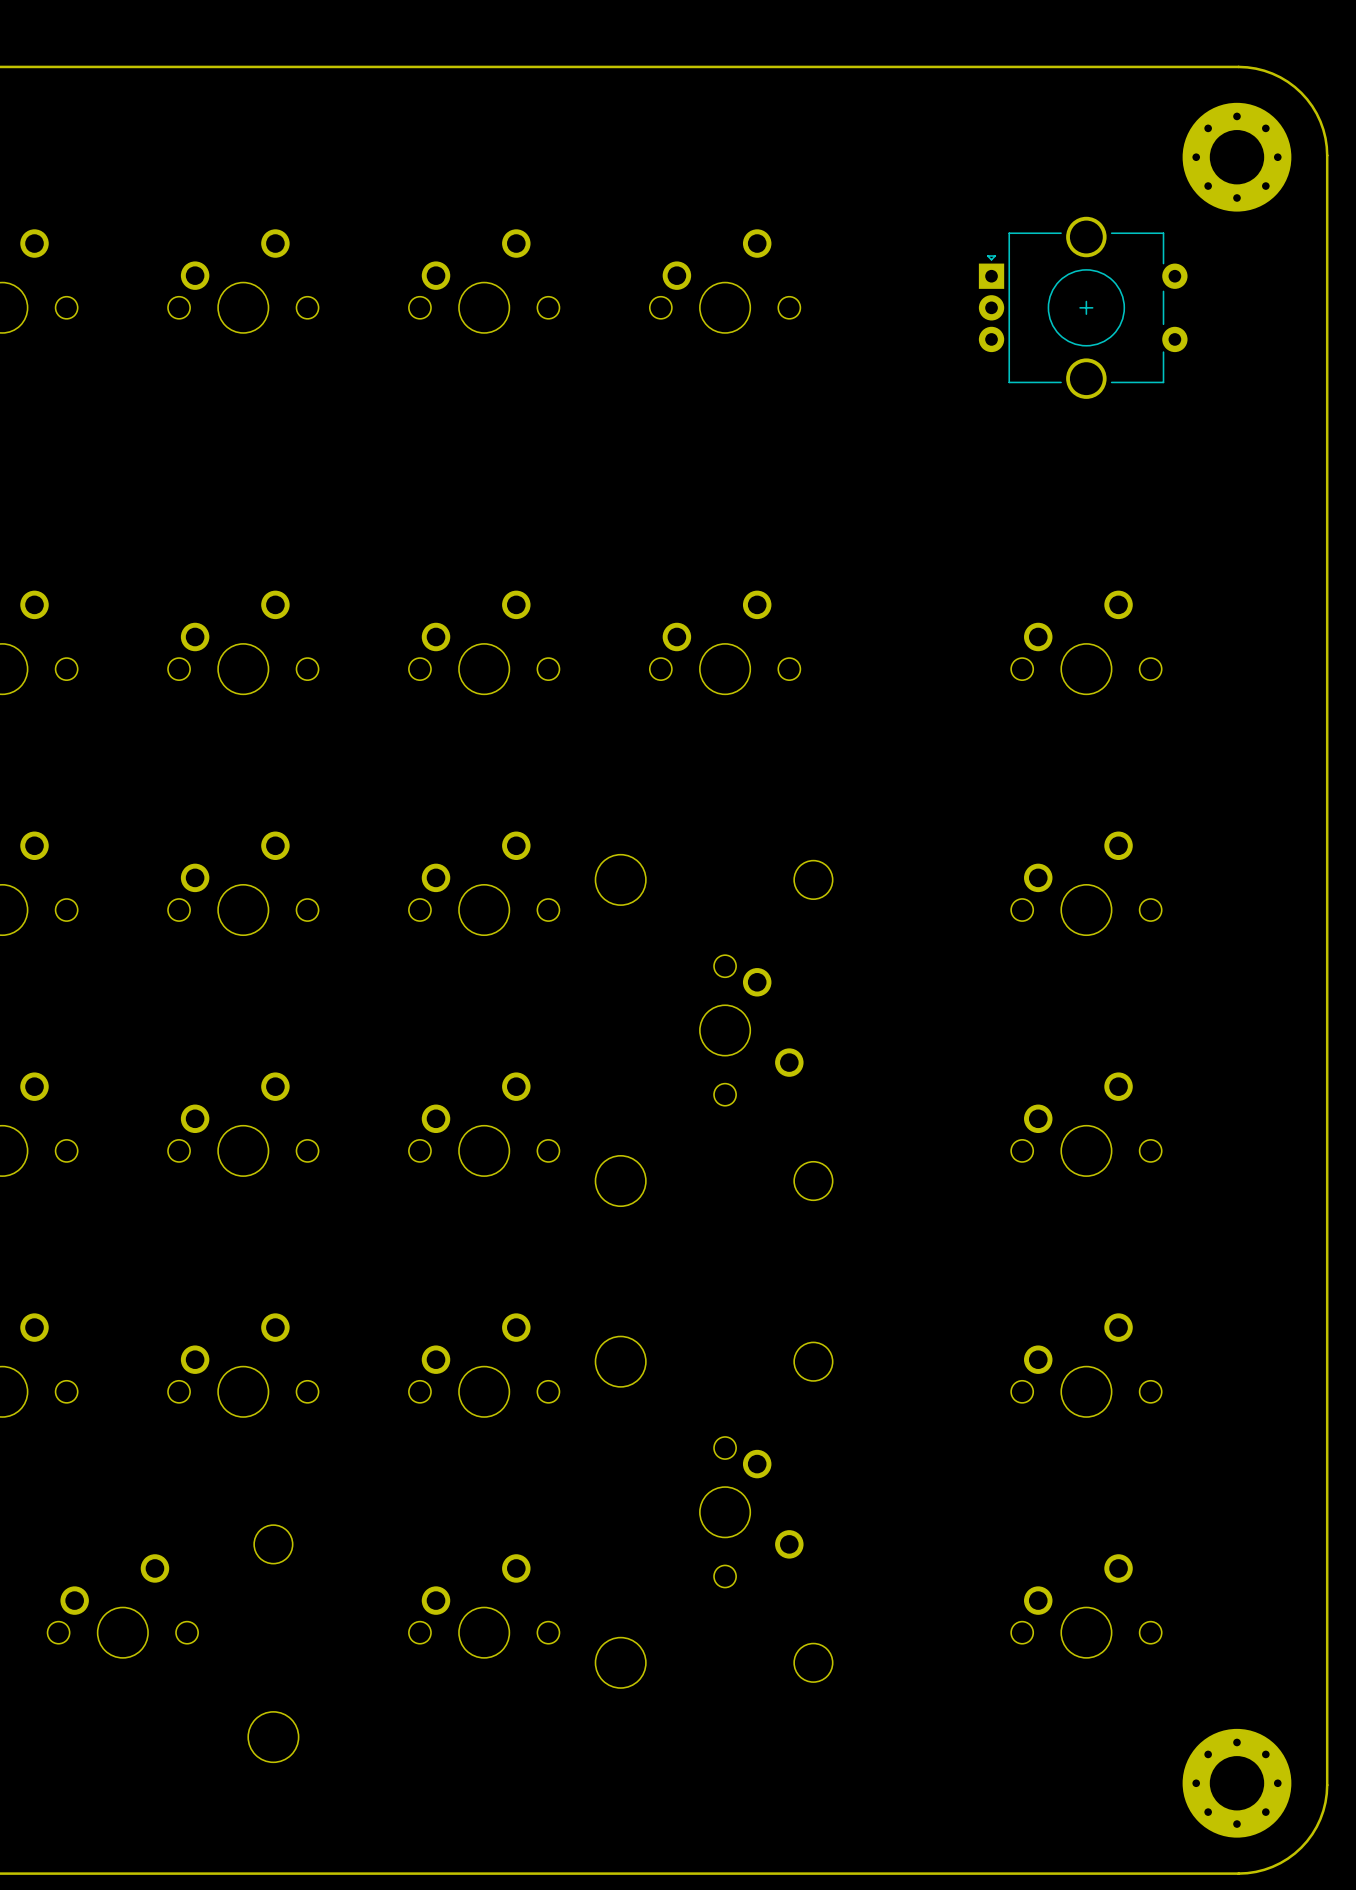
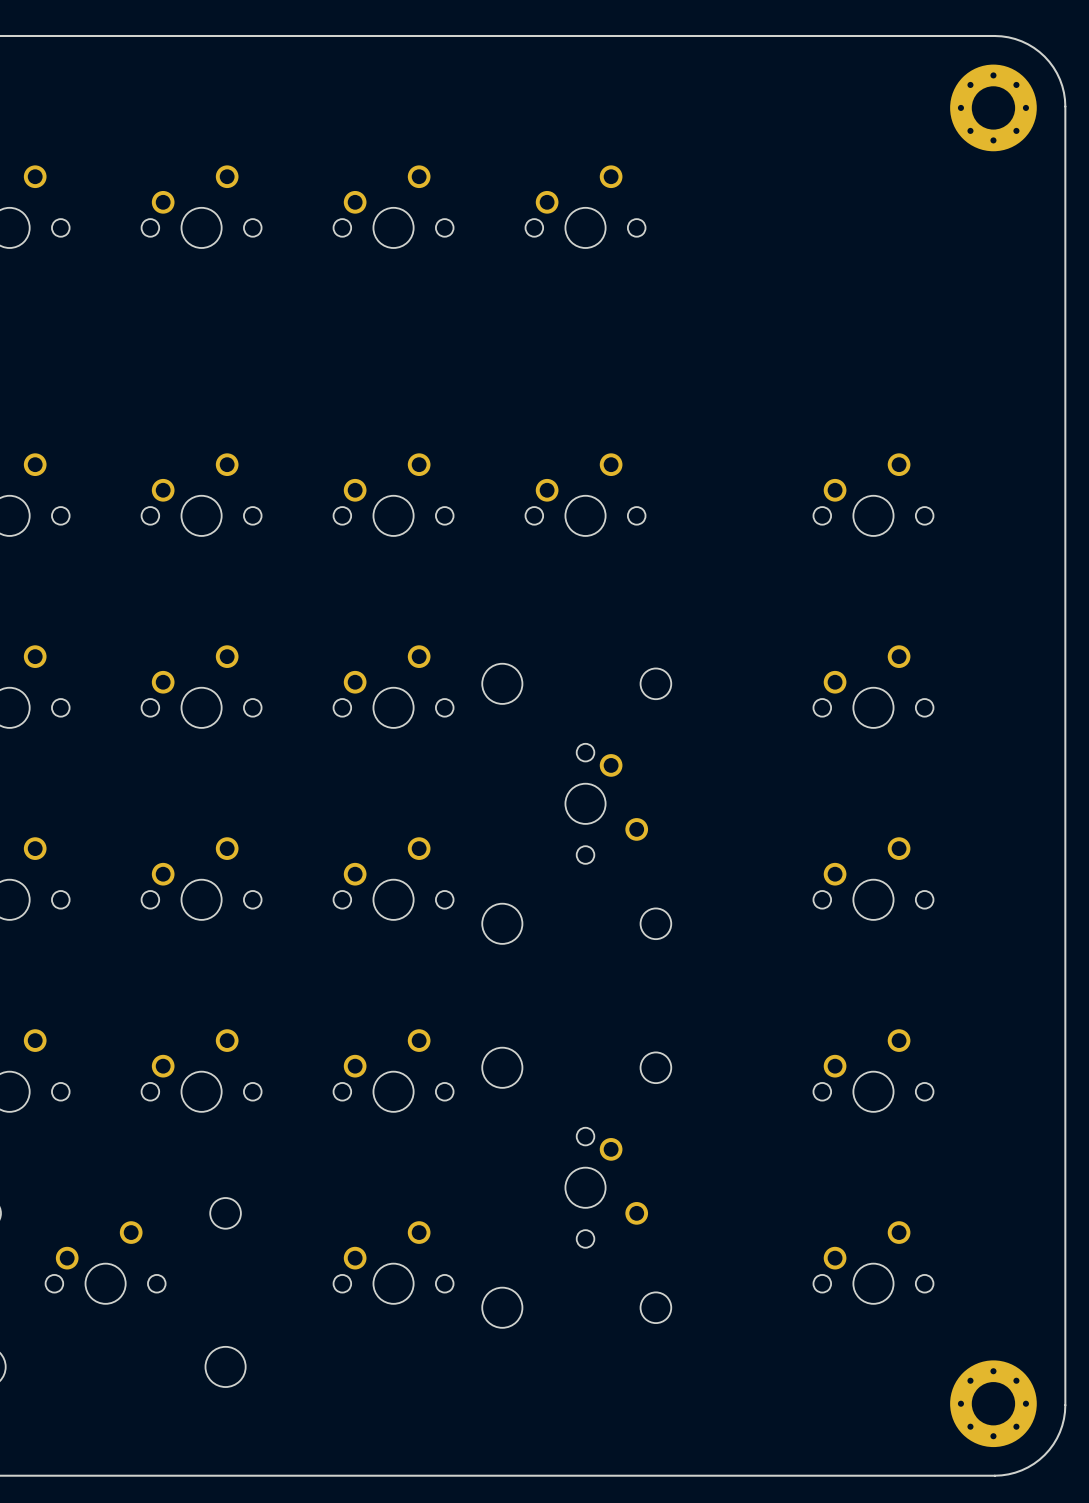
part: (1083, 307) -> none

